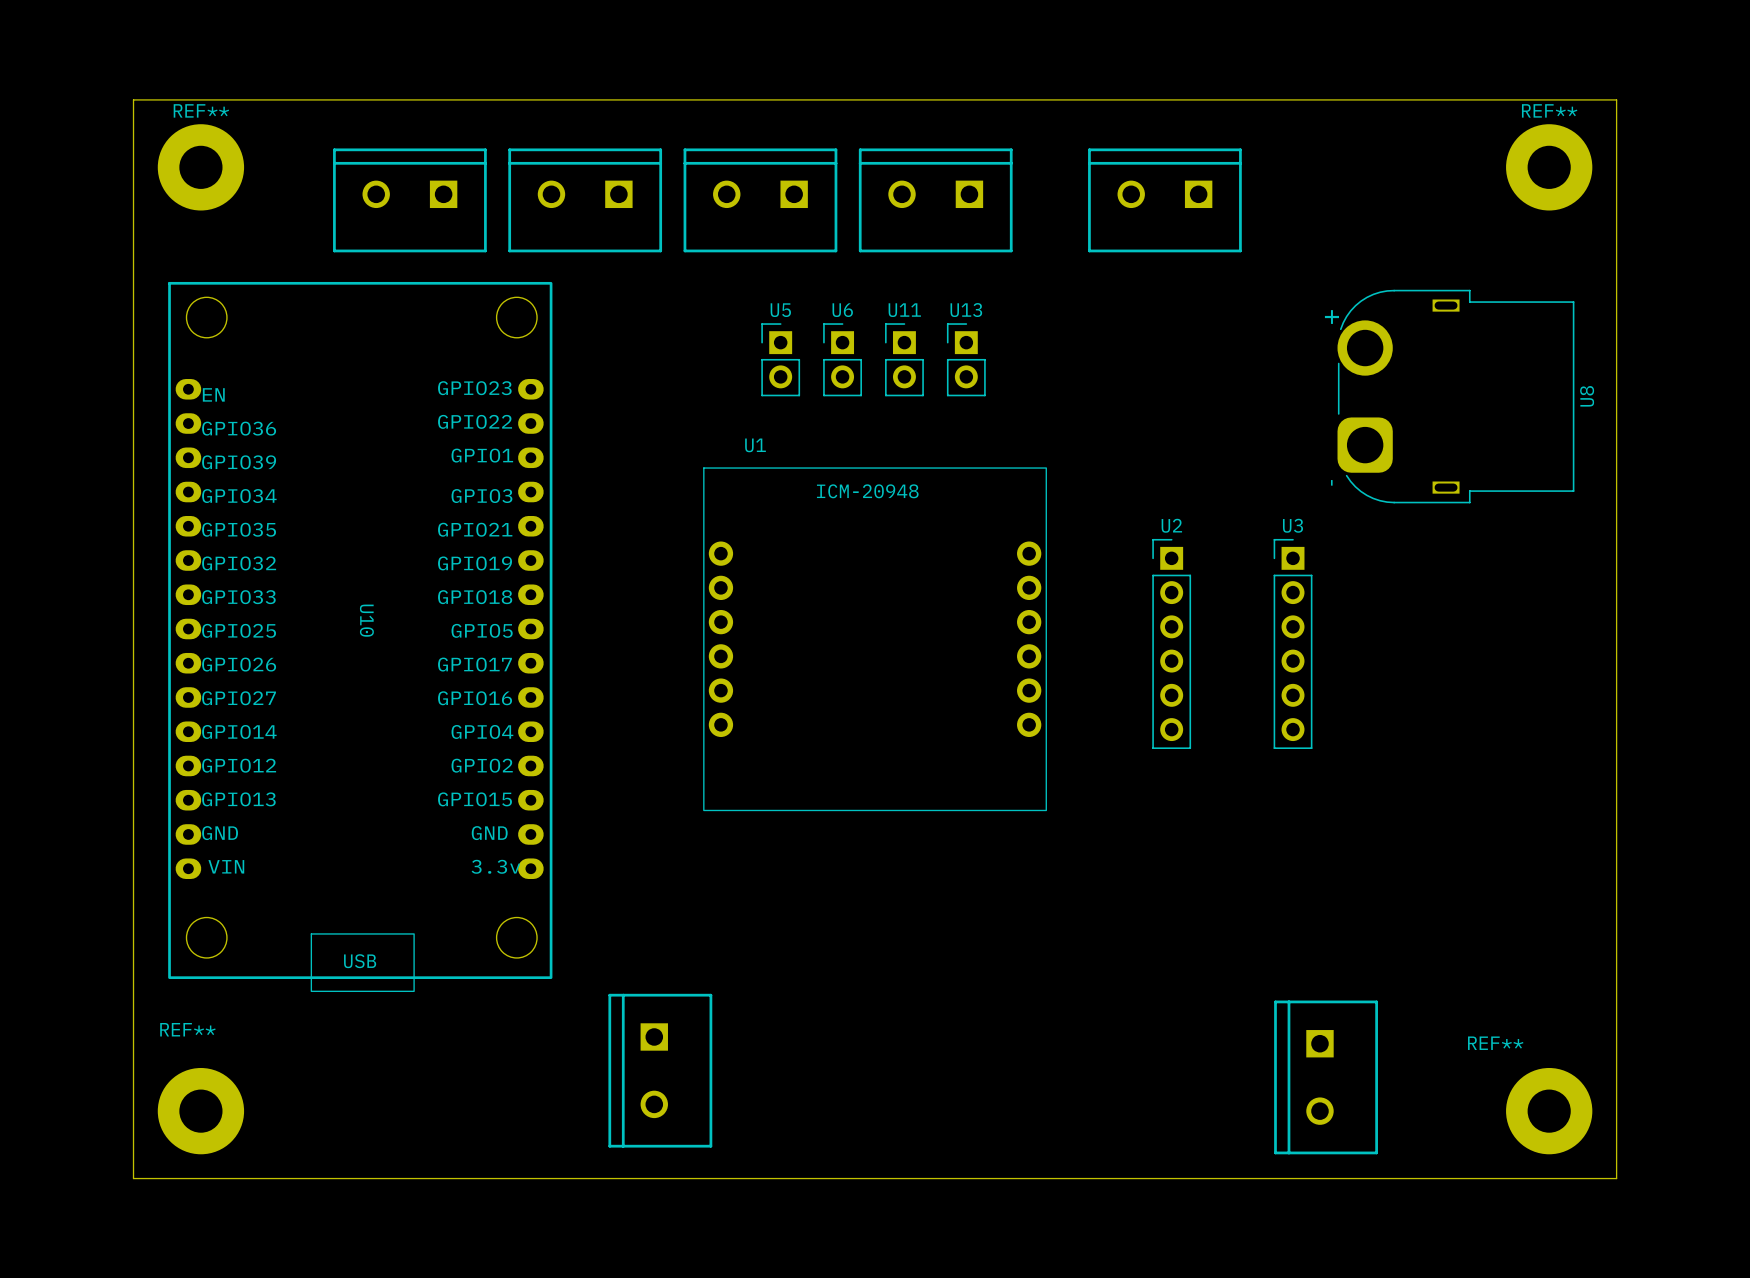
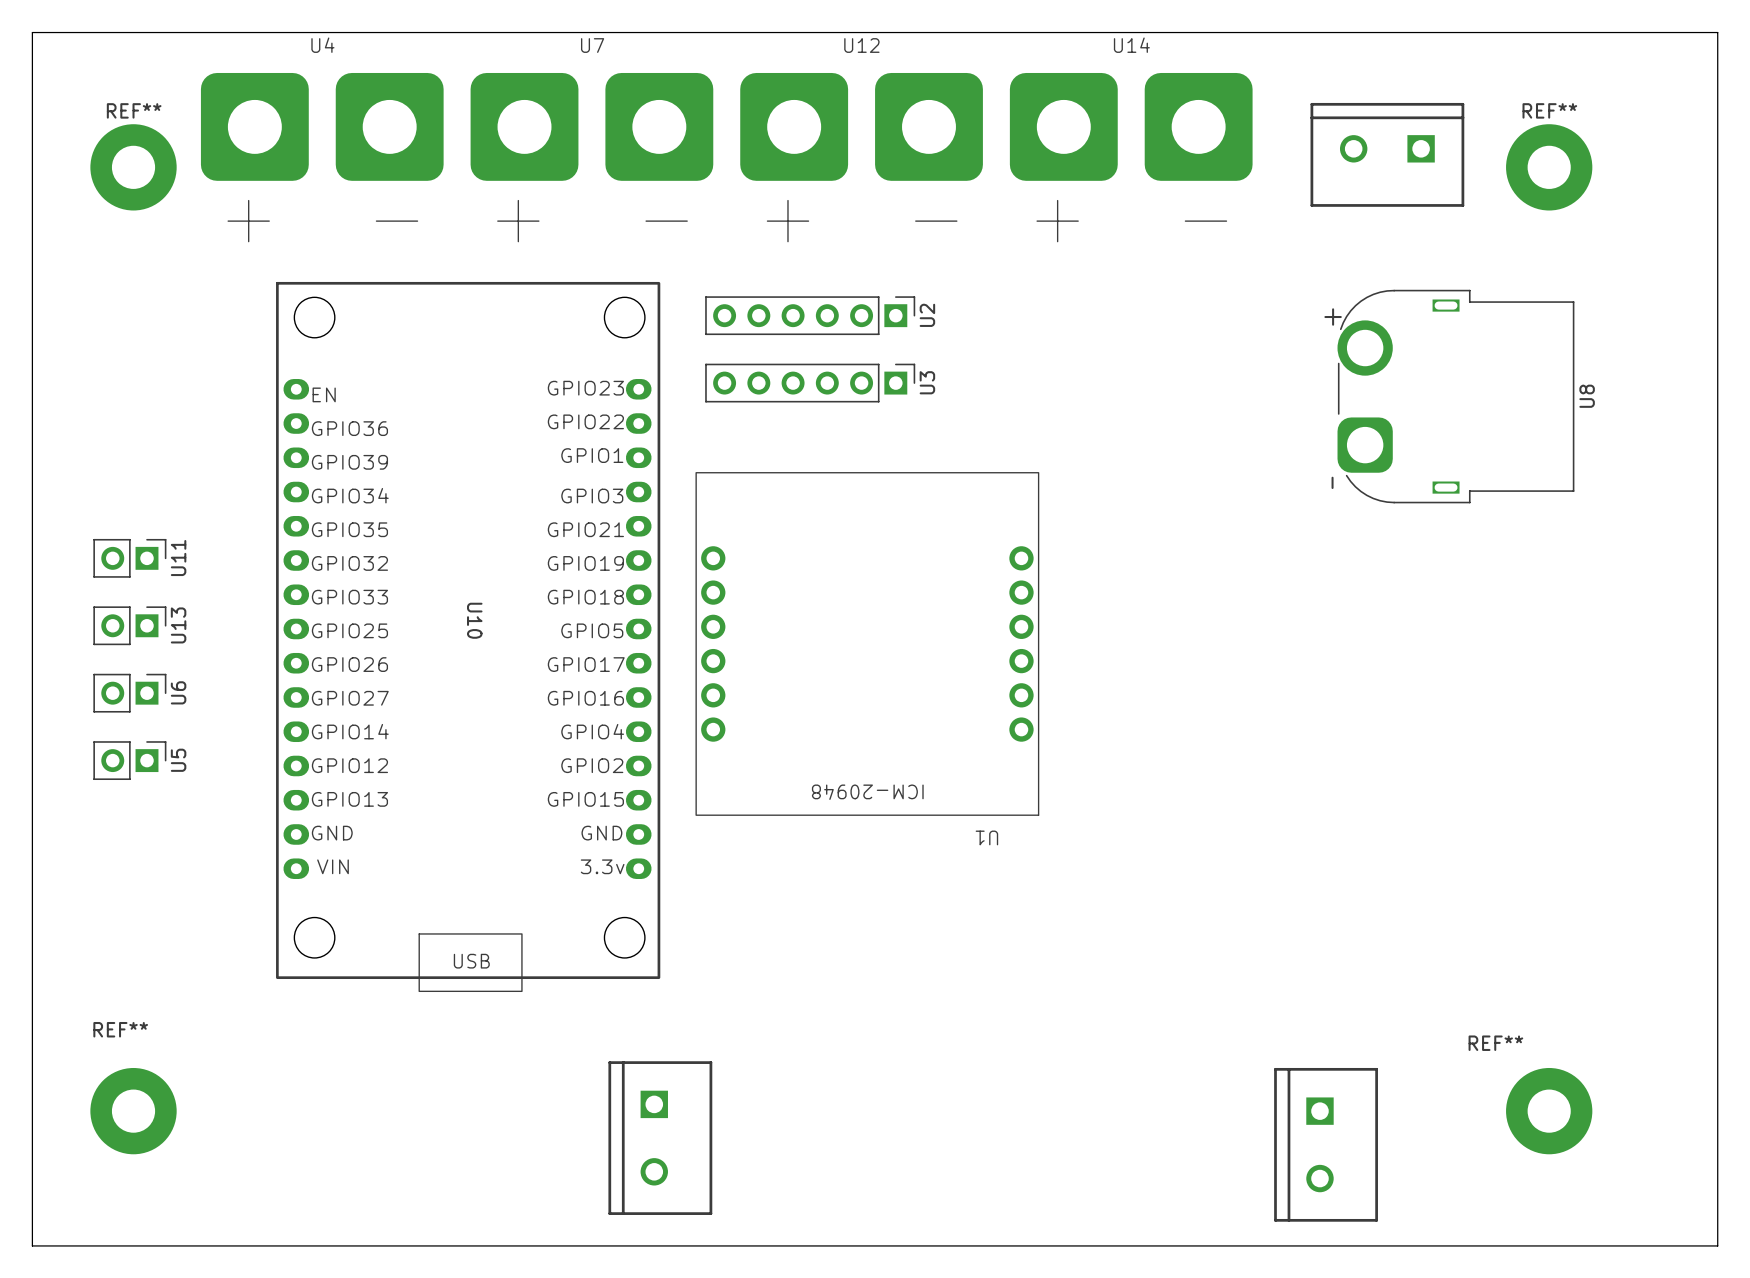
board edge: (133, 99) (1616, 99) (1616, 1178) (133, 1178) (133, 99) -> (32, 32) (32, 1245) (1717, 1245) (1717, 32) (32, 32)
U4: none -> (322, 126)
U7: none -> (591, 126)
U12: none -> (861, 126)
U14: none -> (1131, 126)
part: none -> (1387, 154)
REF** position: (200, 167) -> (133, 167)
part: (409, 200) -> none
part: (585, 200) -> none
part: (760, 200) -> none
part: (935, 200) -> none
part: (1164, 200) -> none
U5 rotation: 0° (780, 359) -> 90° clockwise (129, 760)
U5 position: (780, 359) -> (129, 760)
U6 rotation: 0° (842, 359) -> 90° clockwise (129, 693)
U6 position: (842, 359) -> (129, 693)
U11 rotation: 0° (904, 359) -> 90° clockwise (129, 558)
U11 position: (904, 359) -> (129, 558)
U13 rotation: 0° (966, 359) -> 90° clockwise (129, 625)
U13 position: (966, 359) -> (129, 625)
U10 position: (360, 636) -> (468, 636)
U1 rotation: 0° (875, 639) -> 180° (867, 643)
U2 rotation: 0° (1171, 643) -> 90° clockwise (810, 315)
U2 position: (1171, 643) -> (810, 315)
U3 rotation: 0° (1293, 643) -> 90° clockwise (810, 383)
U3 position: (1293, 643) -> (810, 383)
part position: (660, 1070) -> (660, 1138)
part position: (1326, 1077) -> (1326, 1144)
REF** position: (200, 1111) -> (133, 1111)

